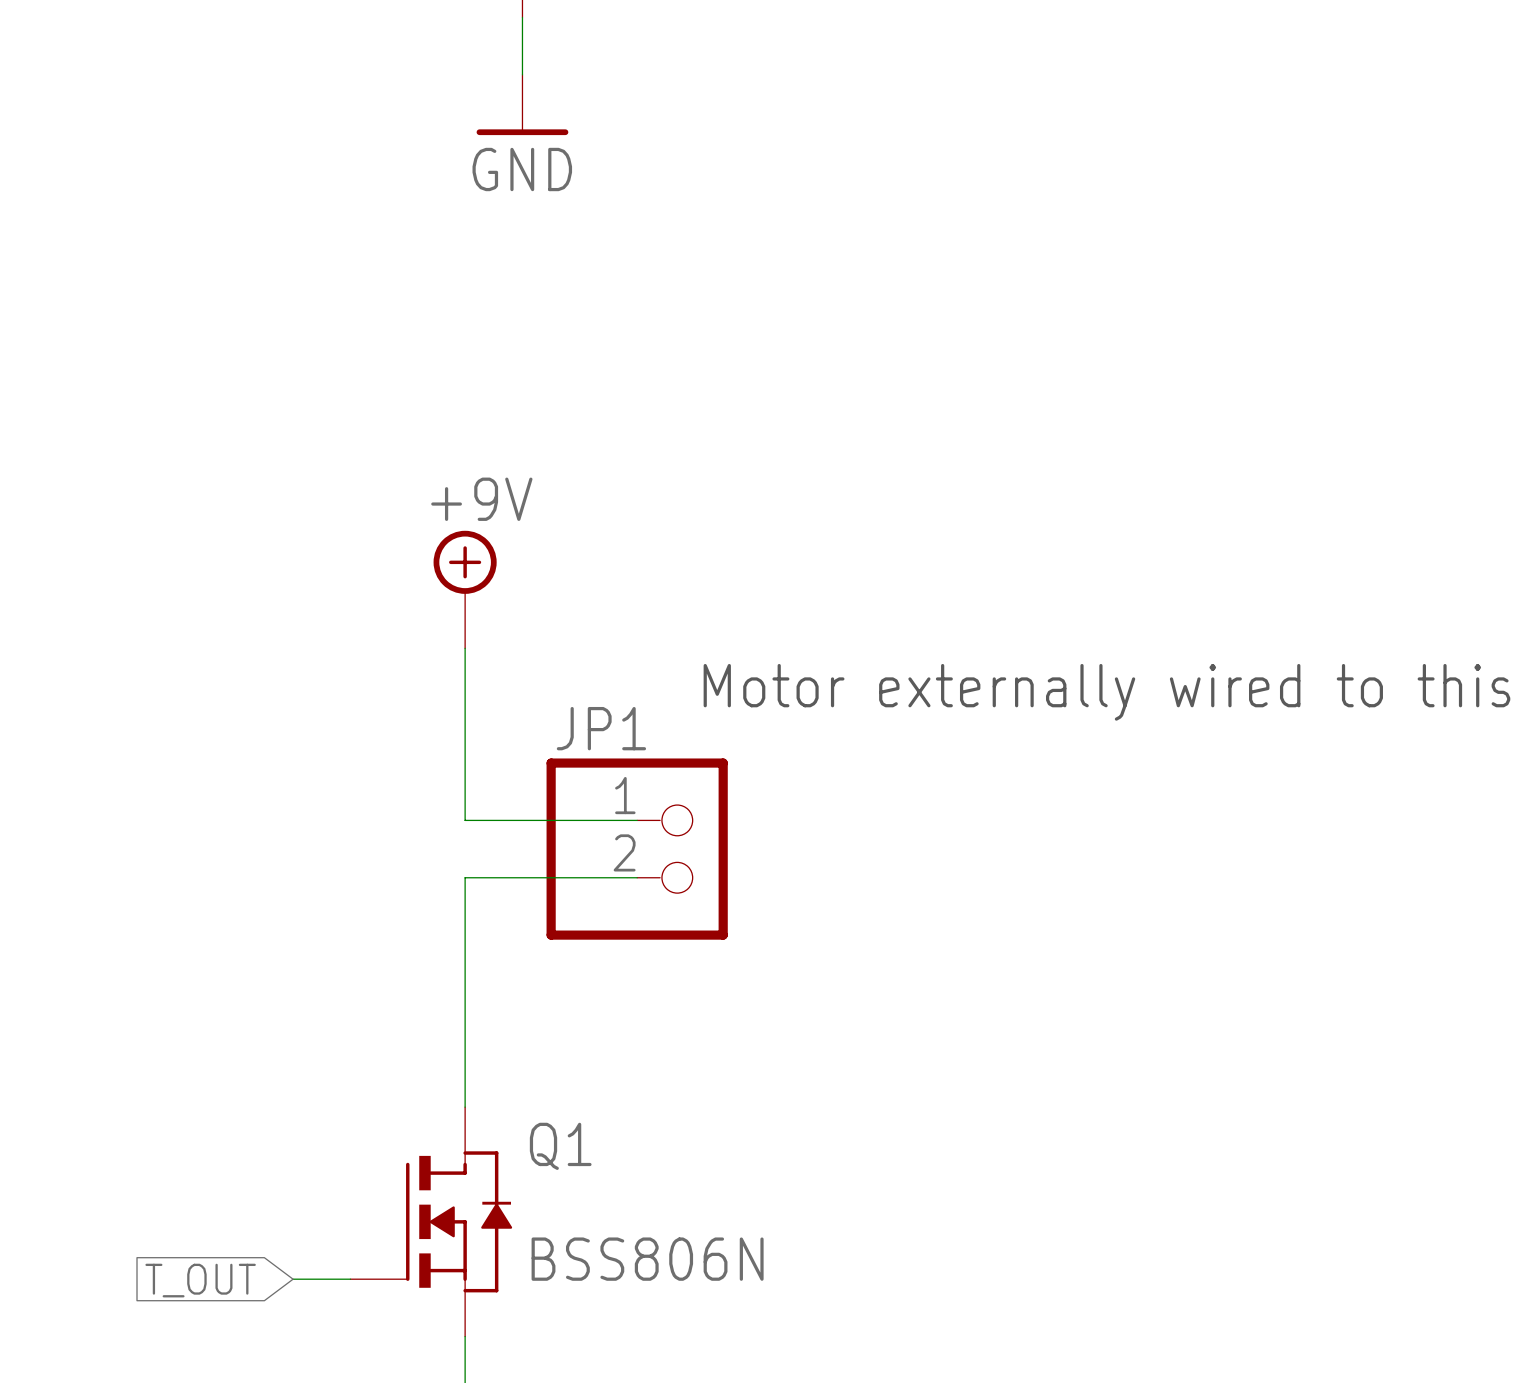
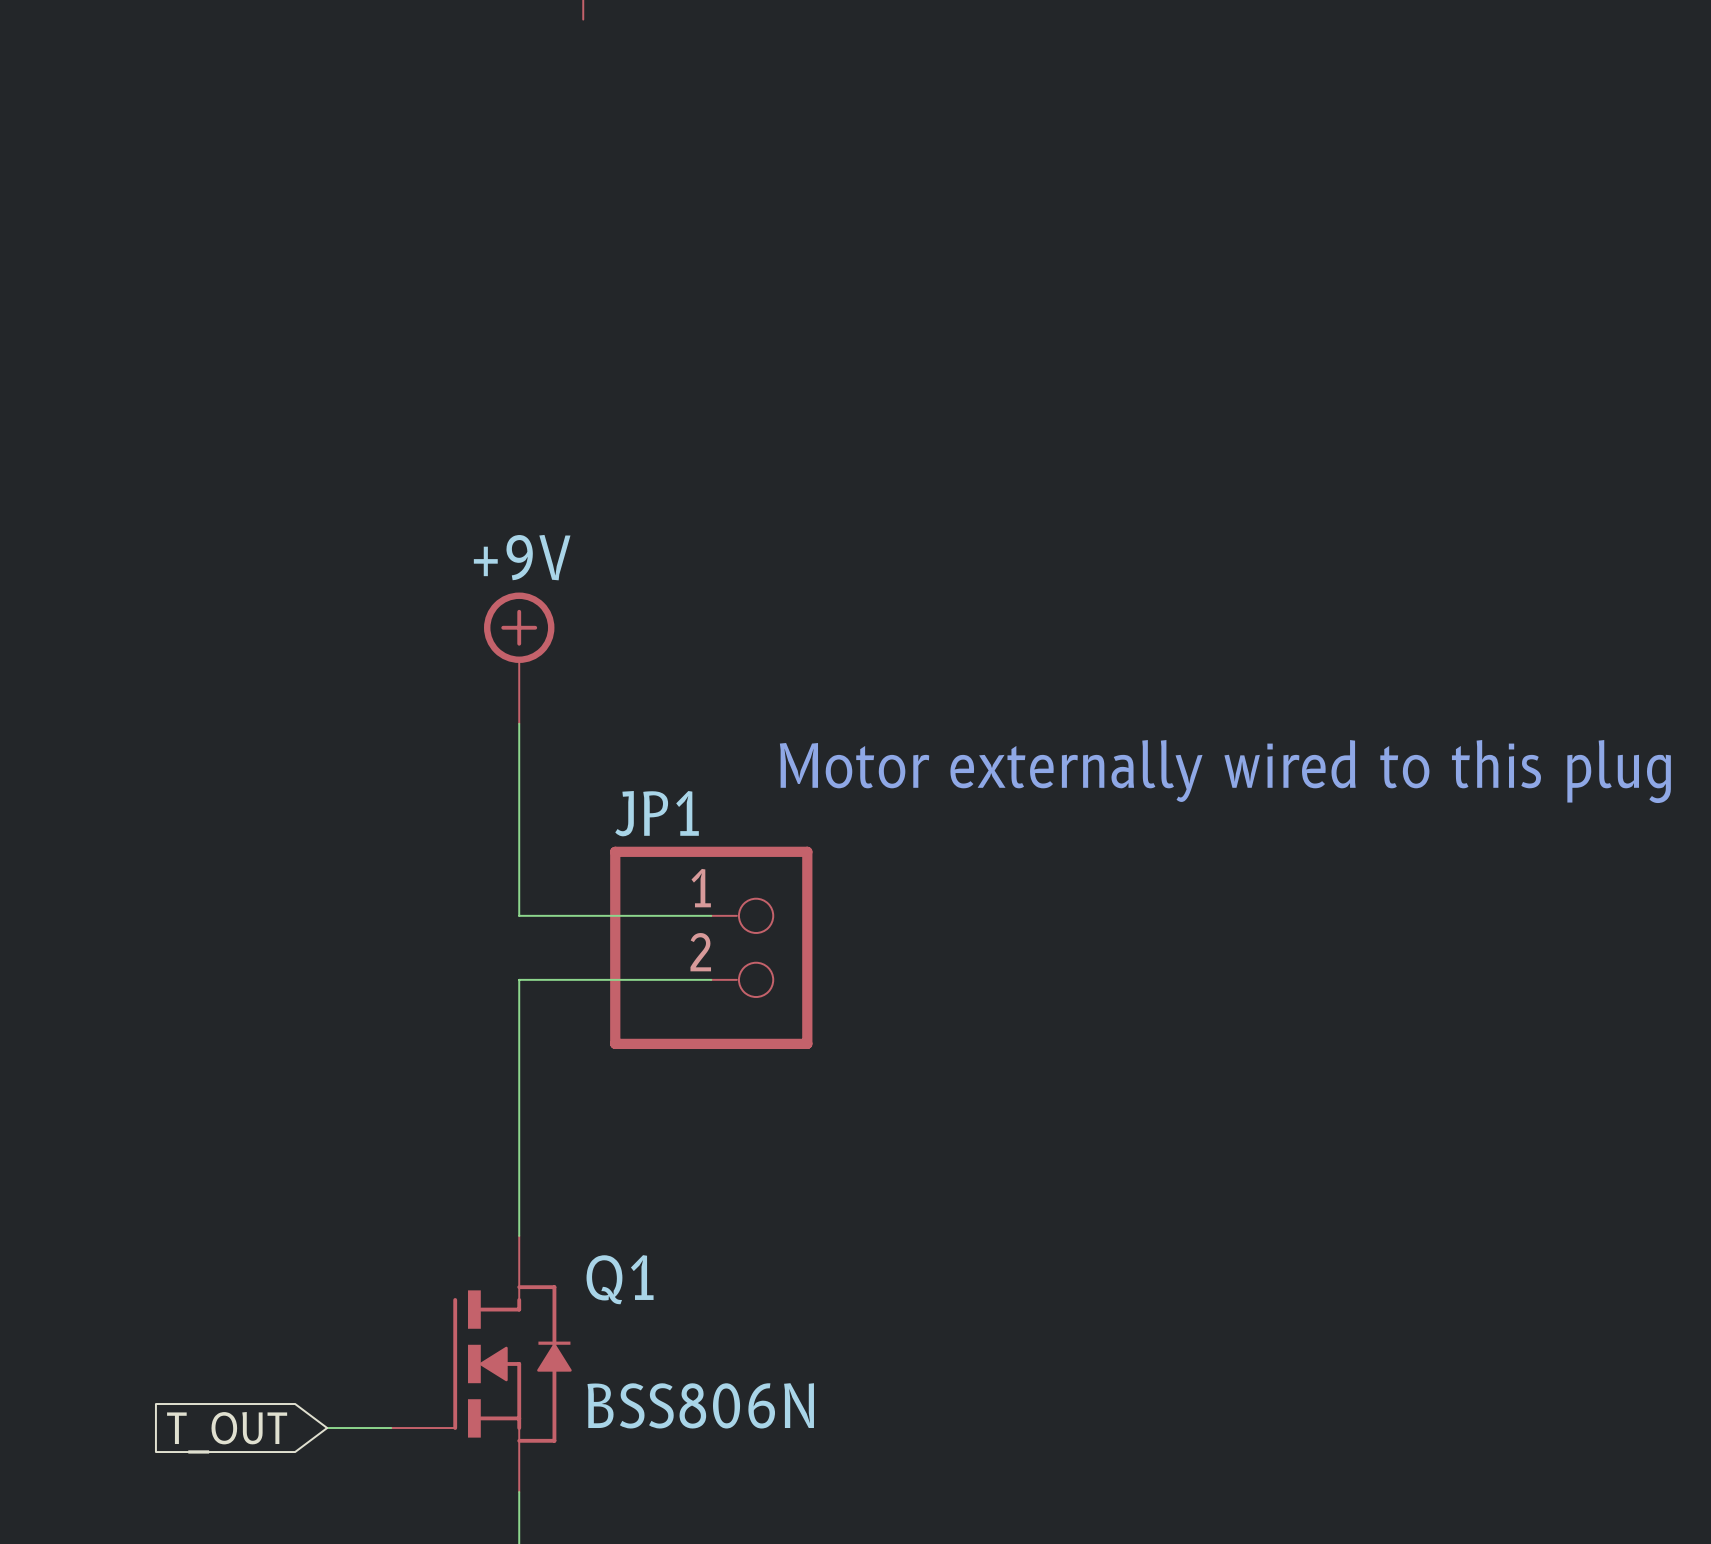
wire: (522, 17) (522, 74) -> none
power symbol: GND (522, 104) -> none

